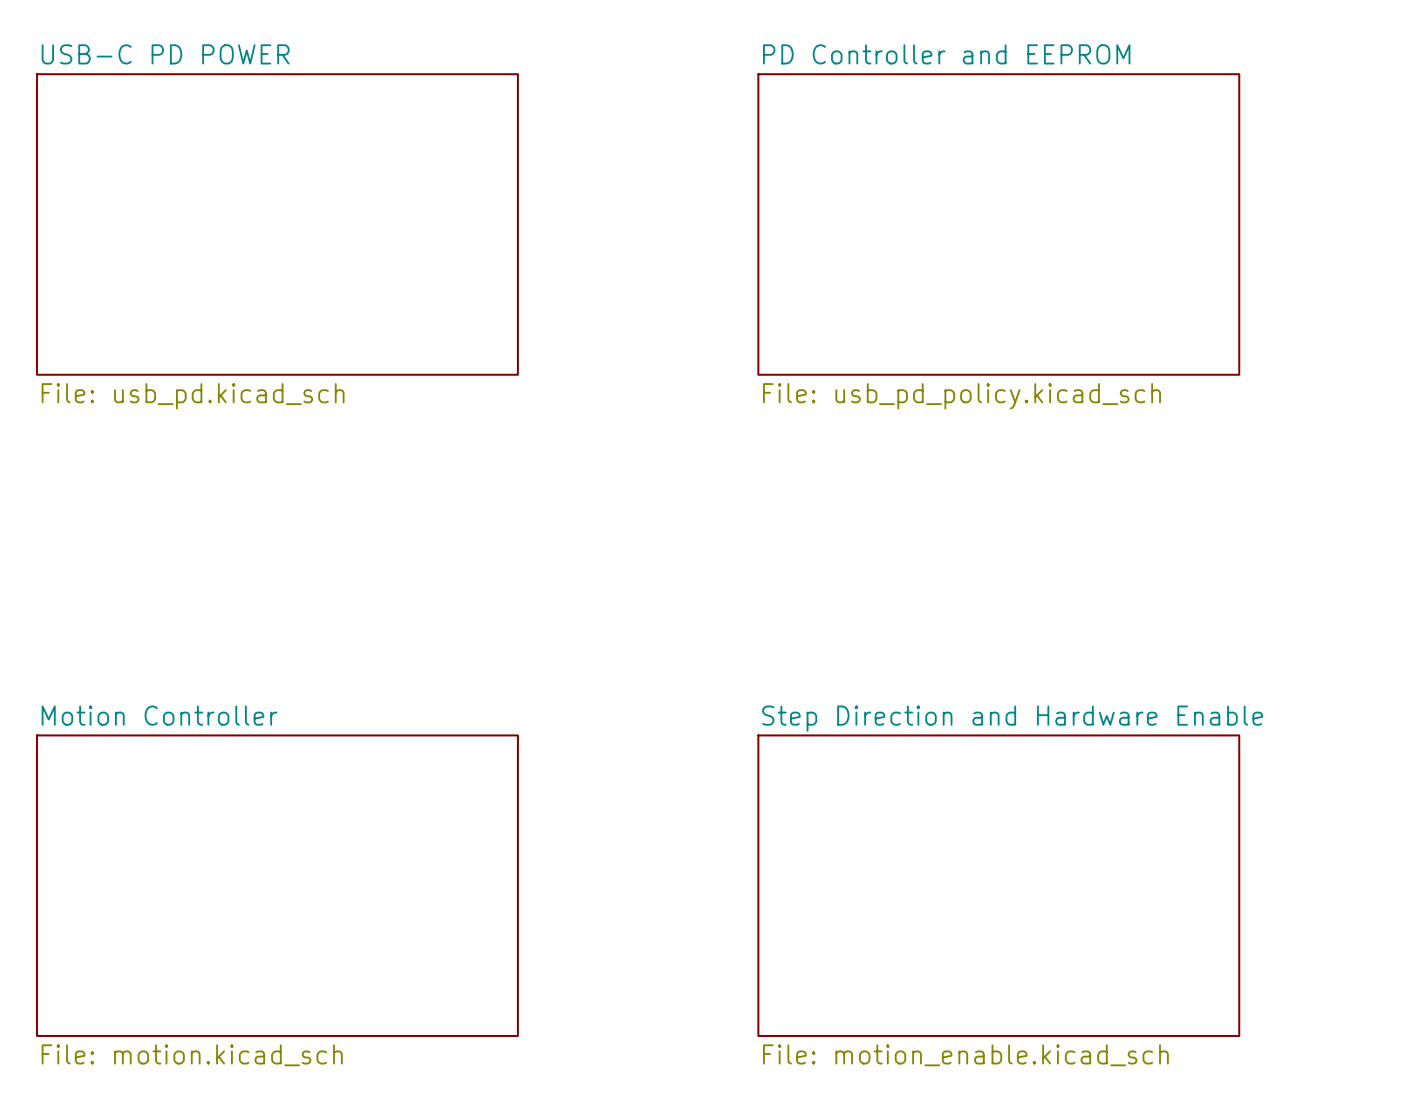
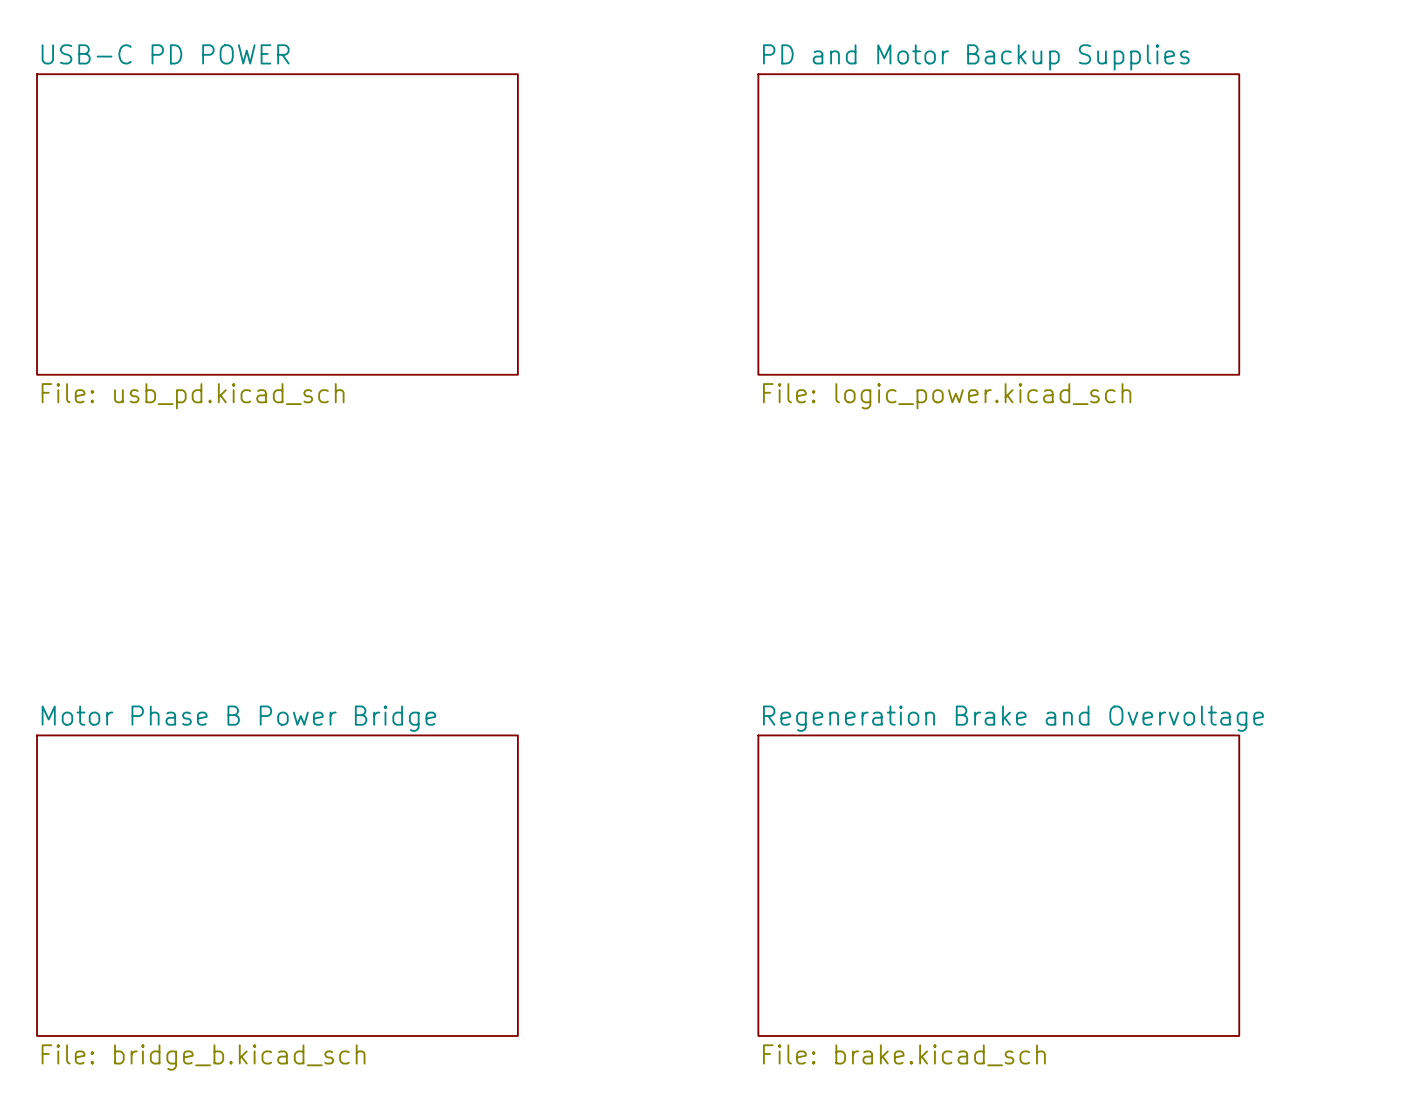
sheet PD Controller and EEPROM name: PD Controller and EEPROM (946, 54) -> PD and Motor Backup Supplies (976, 57)
sheet PD Controller and EEPROM value: File: usb_pd_policy.kicad_sch (961, 396) -> File: logic_power.kicad_sch (947, 396)
sheet Motion Controller name: Motion Controller (159, 715) -> Motor Phase B Power Bridge (238, 718)
sheet Step Direction and Hardware Enable name: Step Direction and Hardware Enable (1012, 718) -> Regeneration Brake and Overvoltage (1013, 718)
sheet Motion Controller value: File: motion.kicad_sch (192, 1055) -> File: bridge_b.kicad_sch (203, 1057)
sheet Step Direction and Hardware Enable value: File: motion_enable.kicad_sch (965, 1055) -> File: brake.kicad_sch (904, 1055)

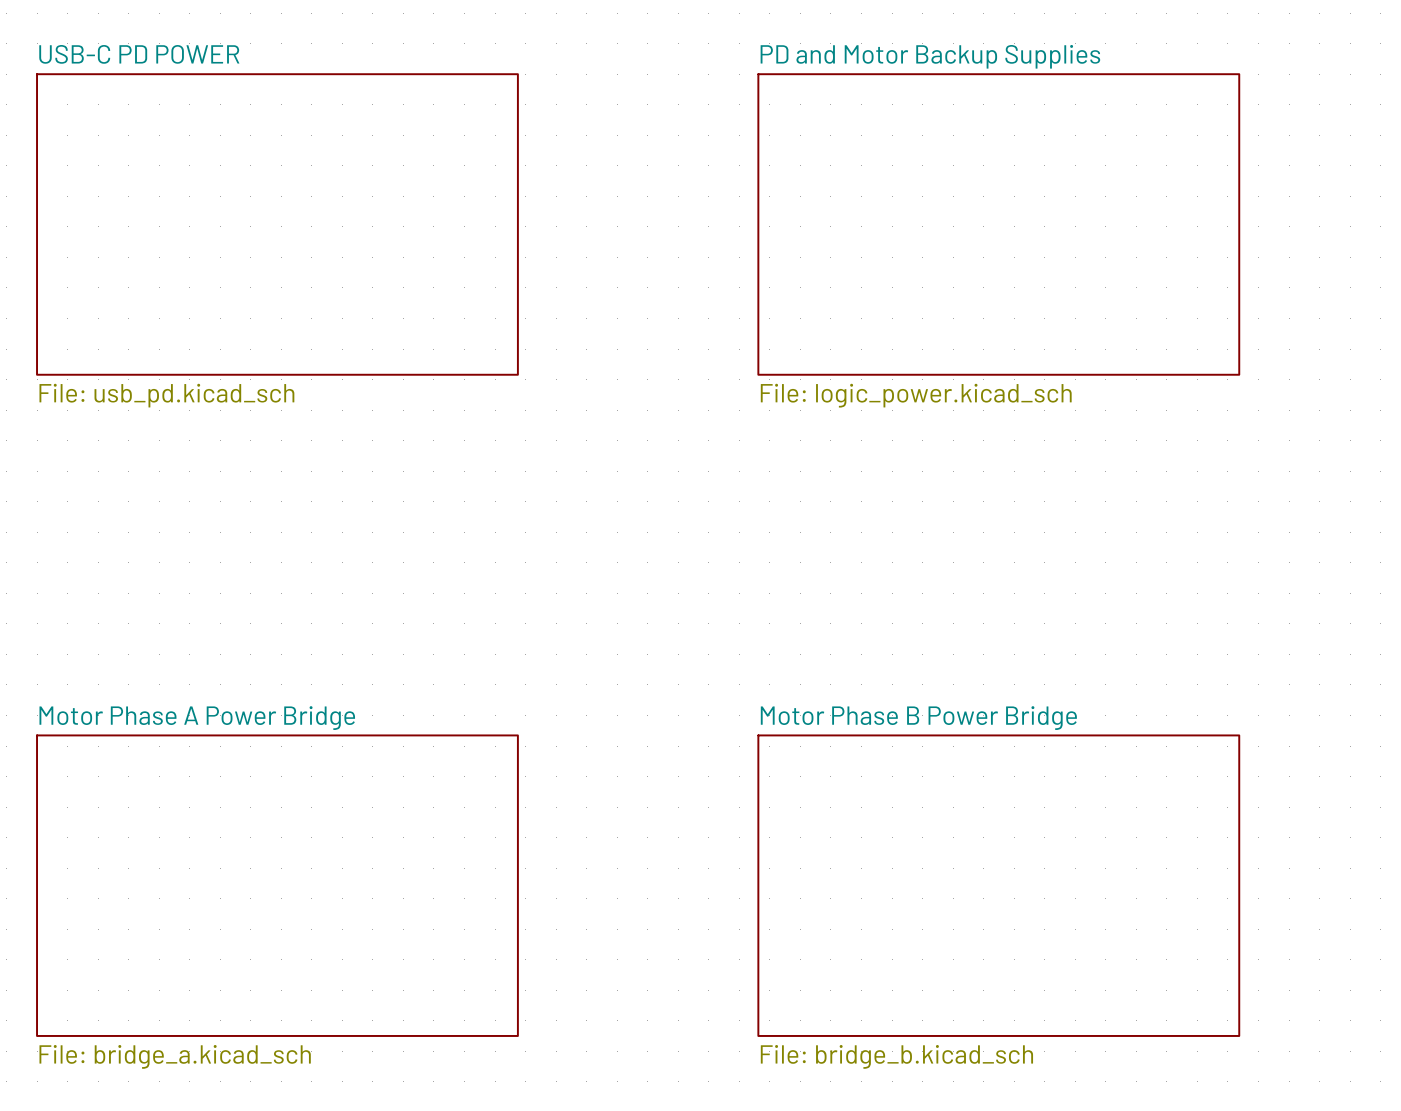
sheet Motor Phase B Power Bridge name: Motor Phase B Power Bridge (238, 718) -> Motor Phase A Power Bridge (197, 718)
sheet Regeneration Brake and Overvoltage name: Regeneration Brake and Overvoltage (1013, 718) -> Motor Phase B Power Bridge (918, 718)
sheet Regeneration Brake and Overvoltage value: File: brake.kicad_sch (904, 1055) -> File: bridge_b.kicad_sch (896, 1056)
sheet Motor Phase B Power Bridge value: File: bridge_b.kicad_sch (203, 1057) -> File: bridge_a.kicad_sch (175, 1056)

